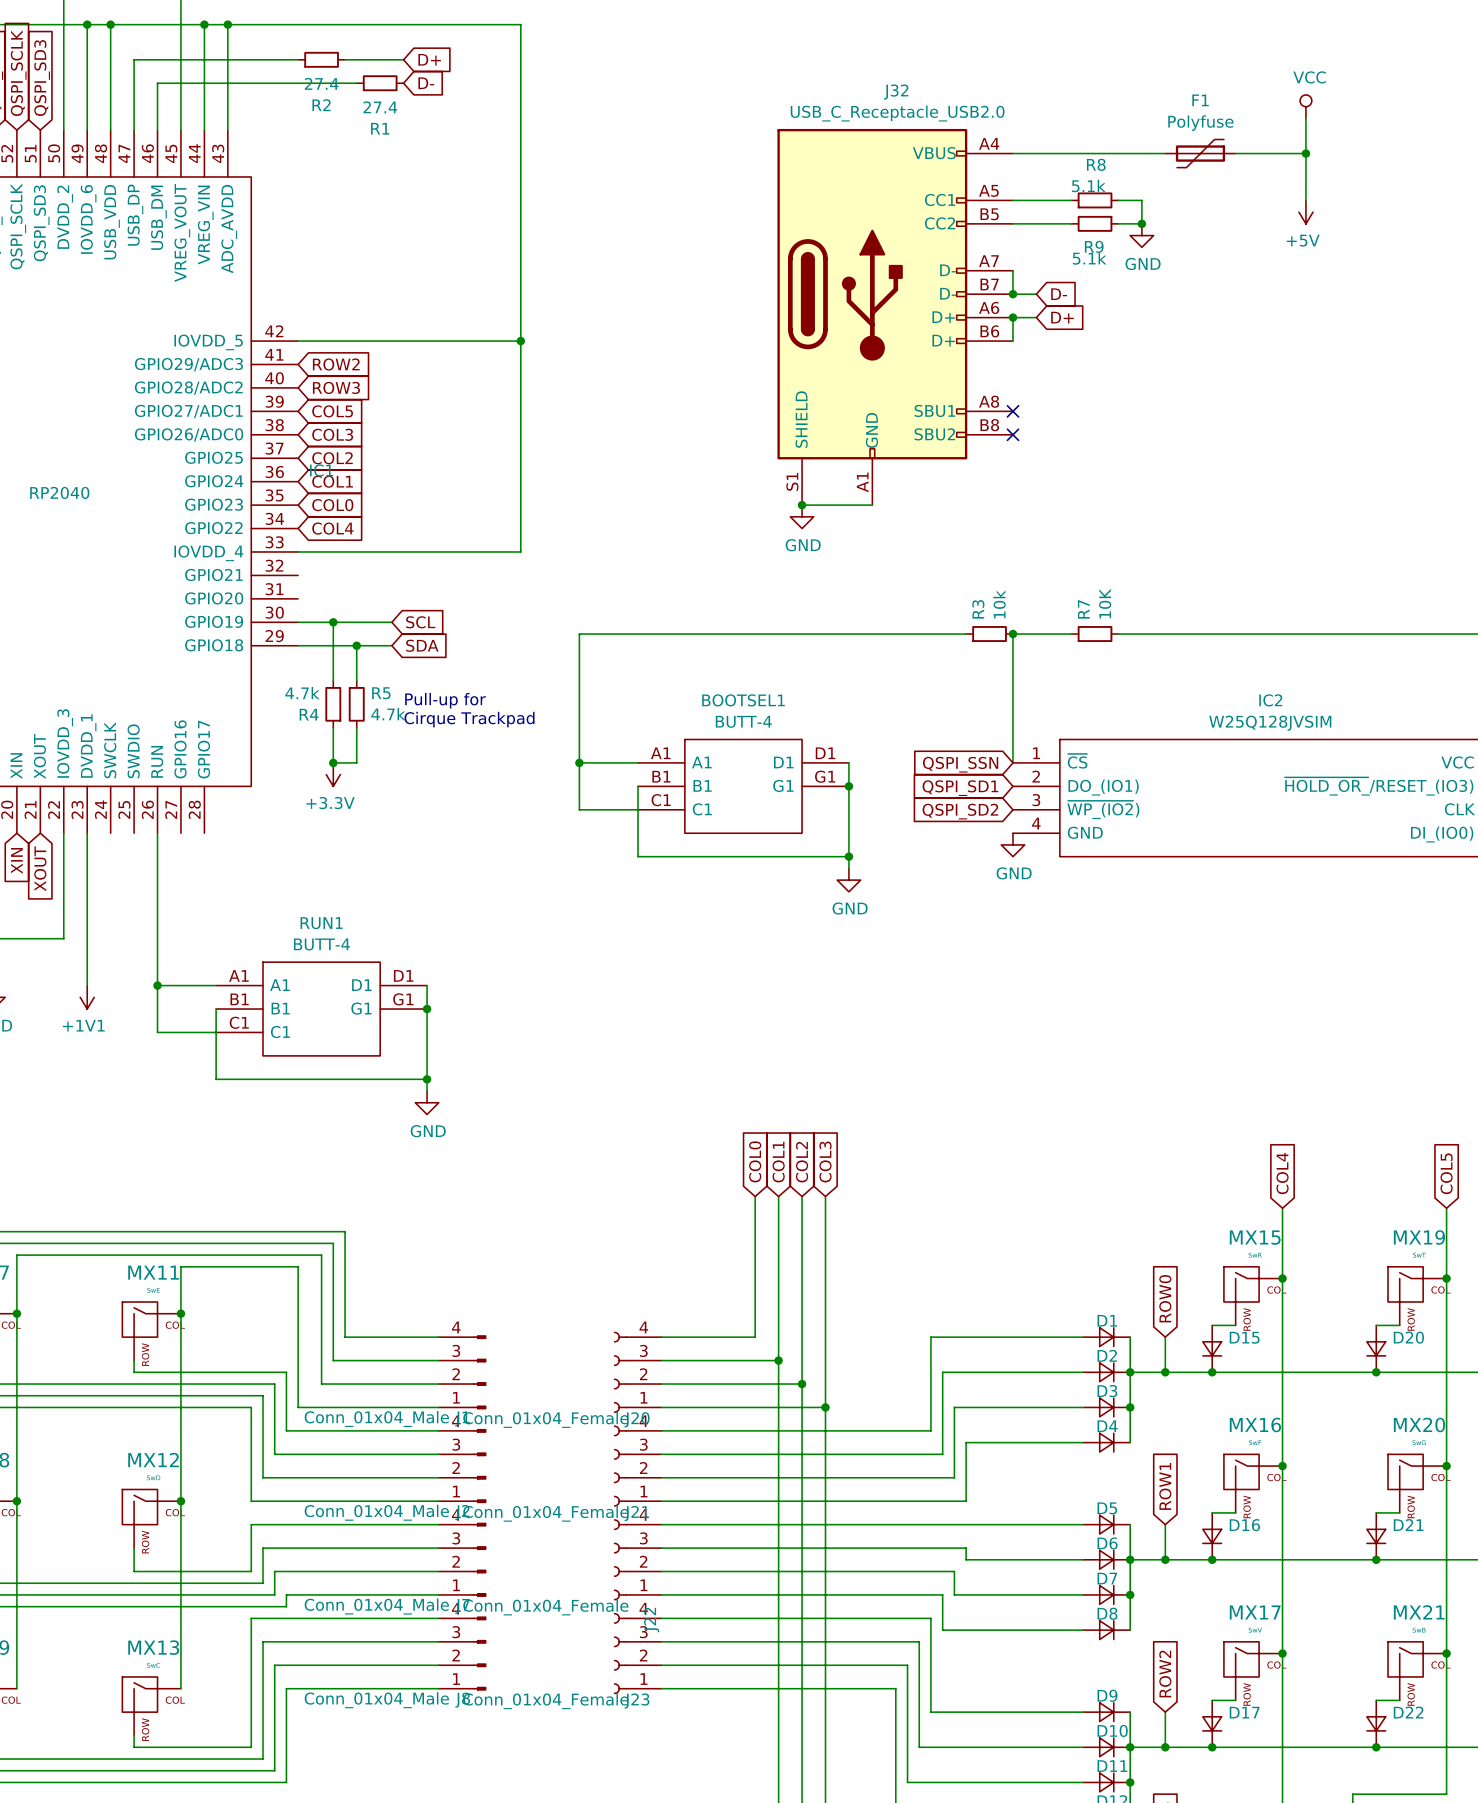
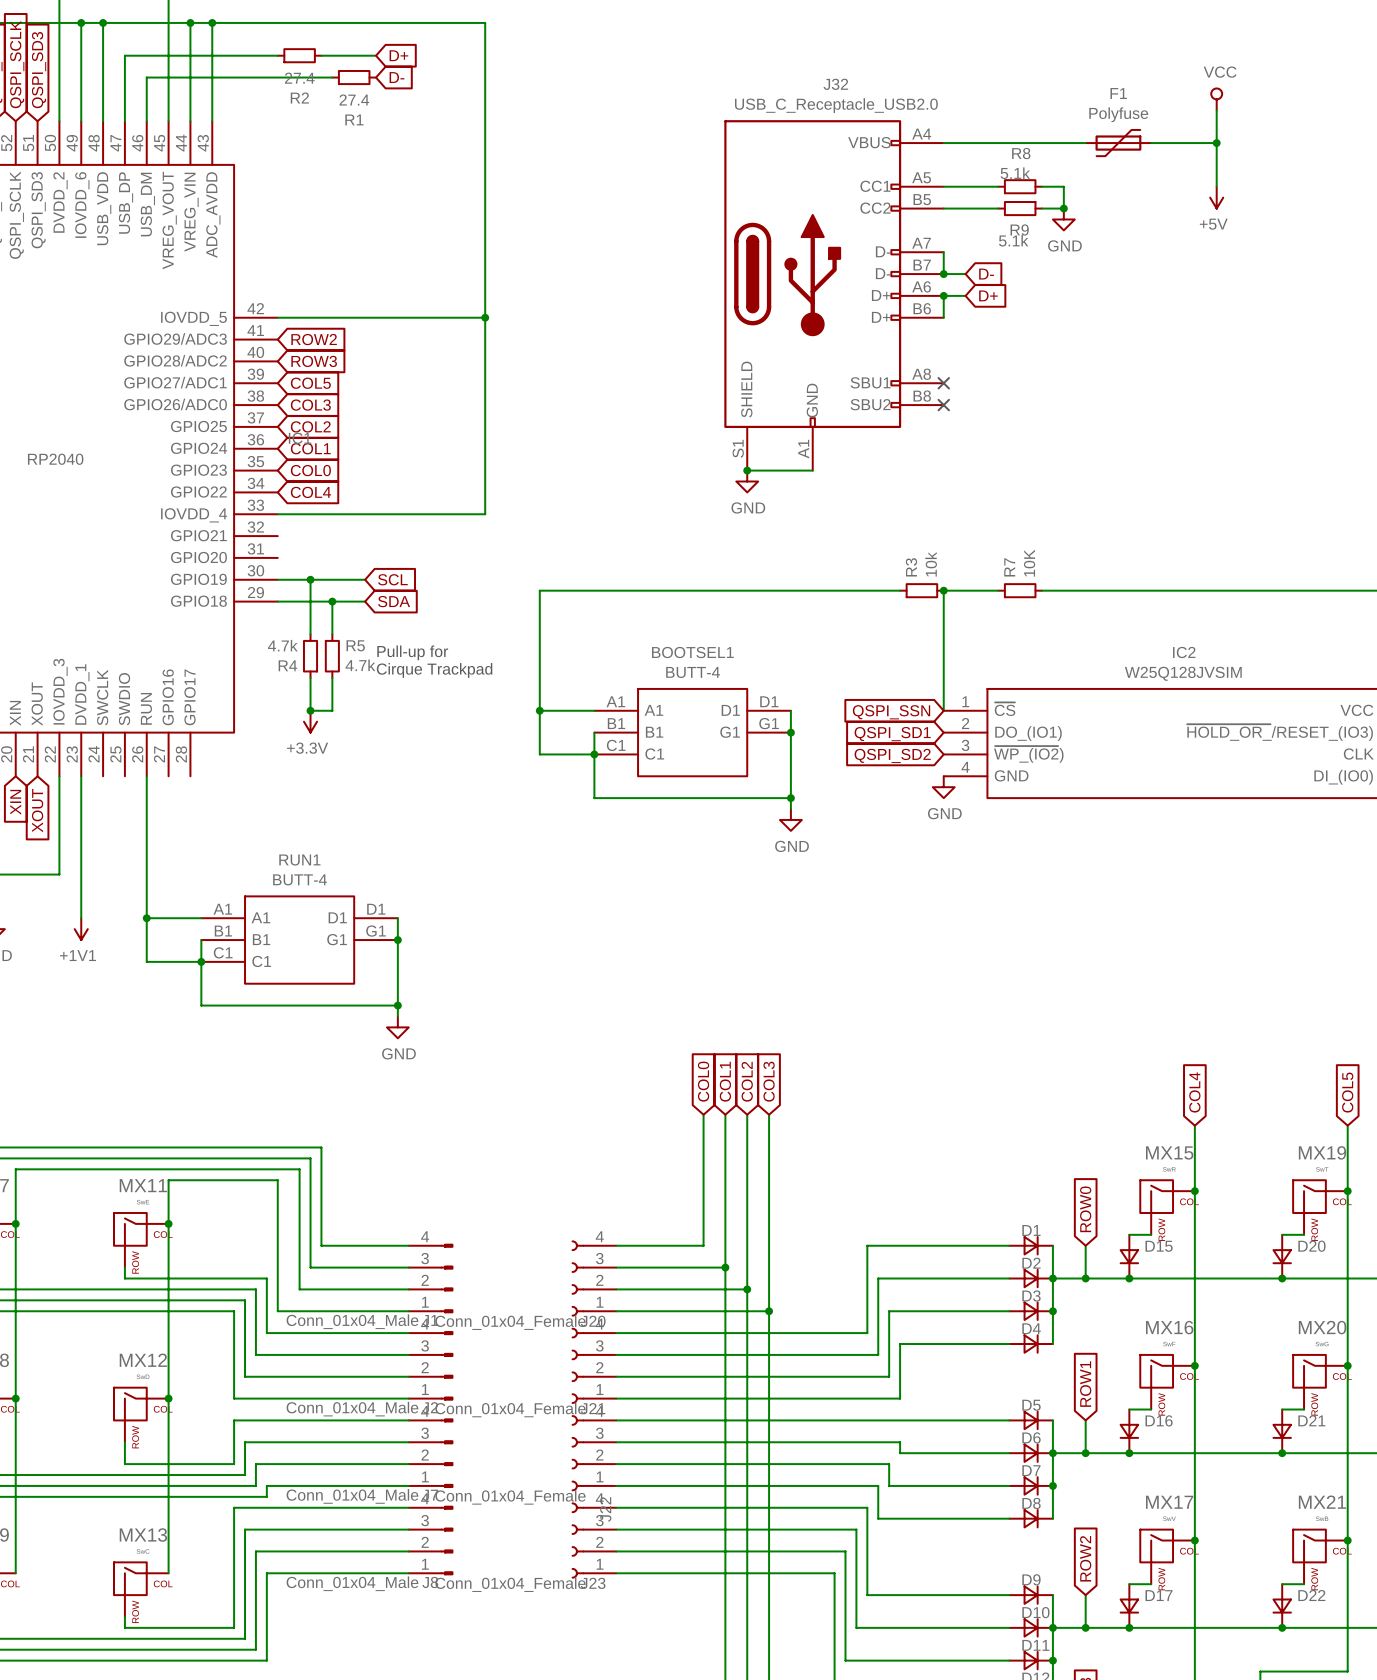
junction: none -> (594, 754)
junction: none -> (201, 961)

